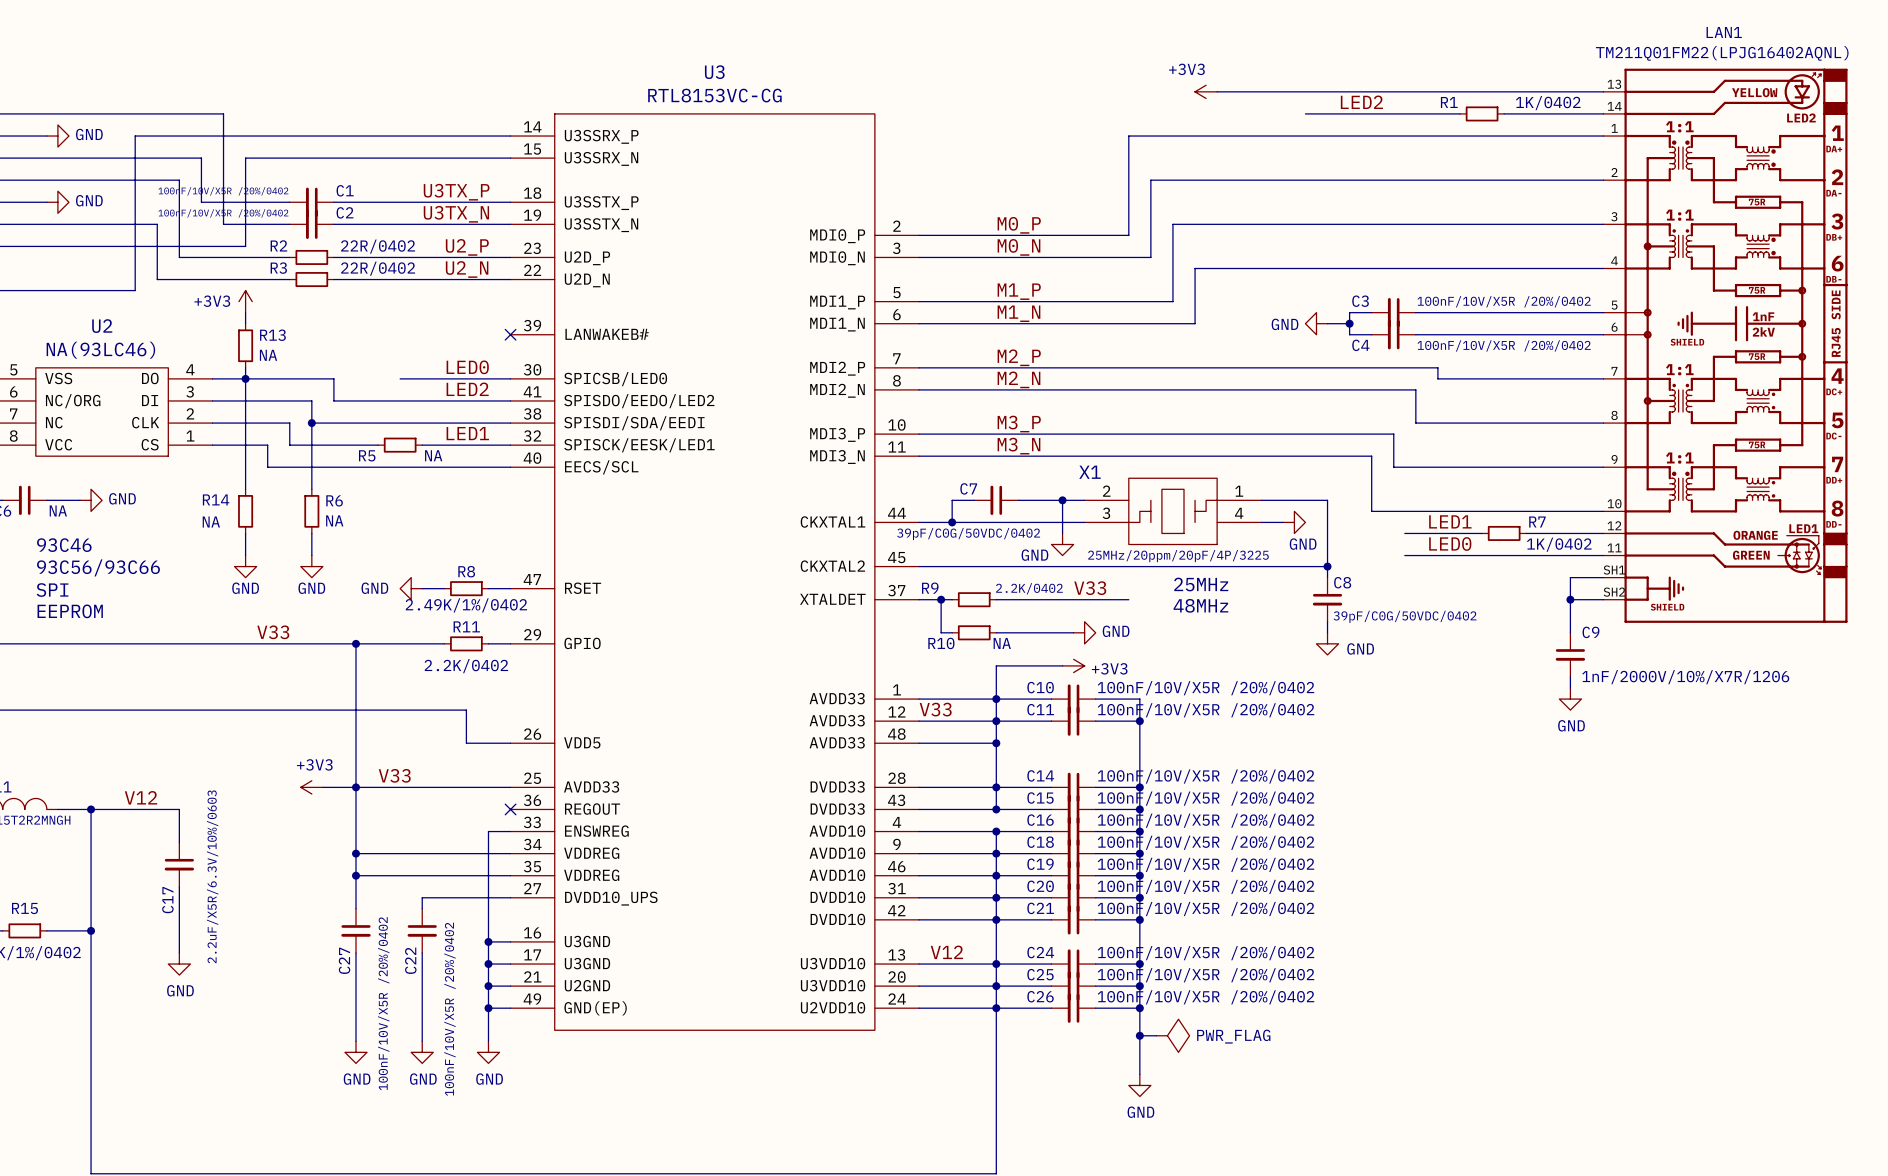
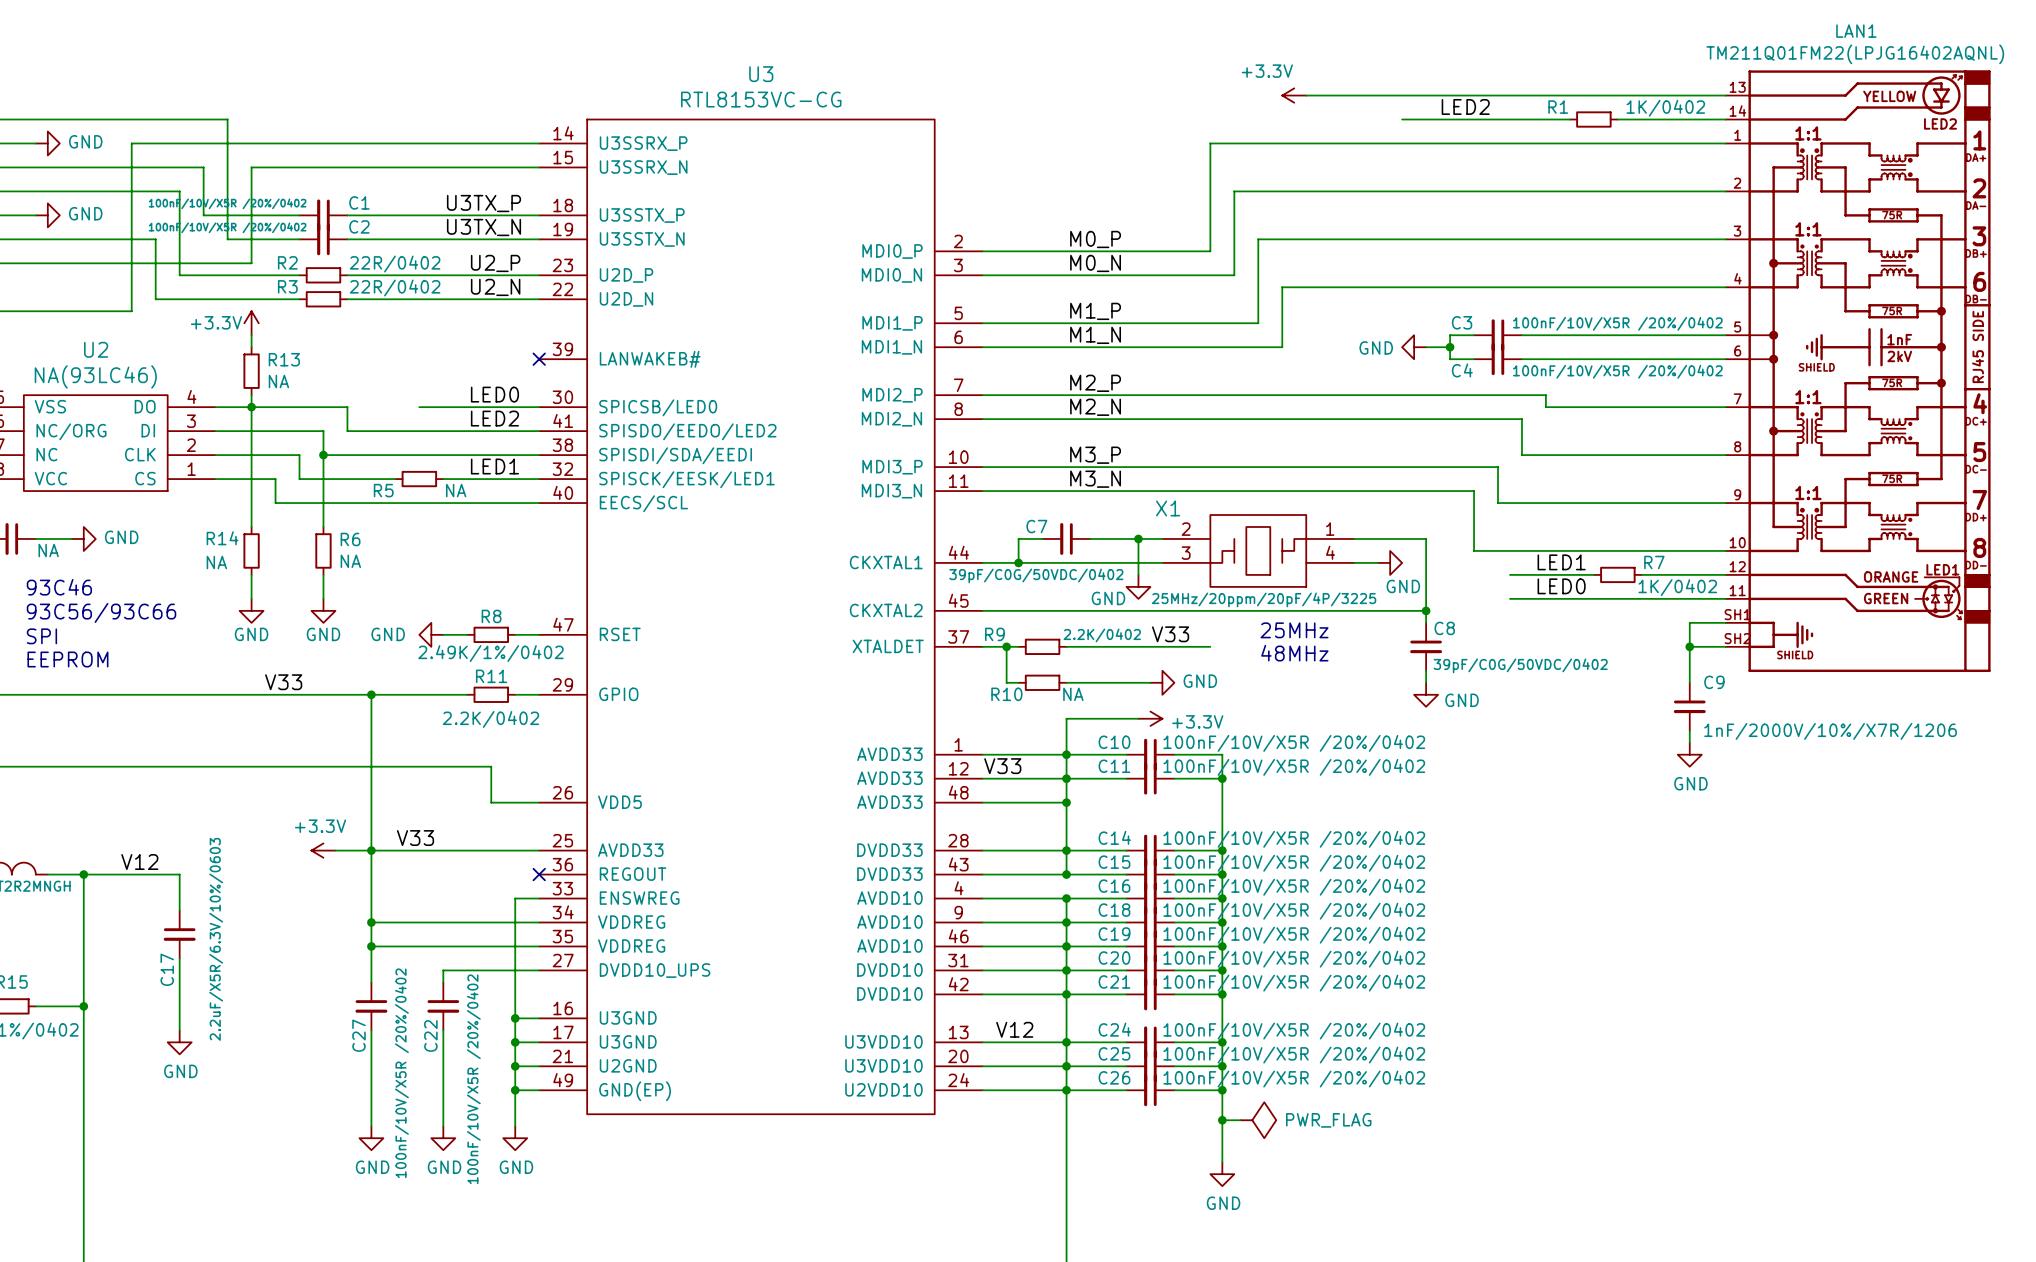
power symbol: +3V3 (1206, 91) -> +3.3V (1294, 95)
power symbol: +3V3 (245, 301) -> +3.3V (251, 323)
power symbol: +3V3 (1073, 665) -> +3.3V (1150, 718)
power symbol: +3V3 (311, 787) -> +3.3V (323, 850)

